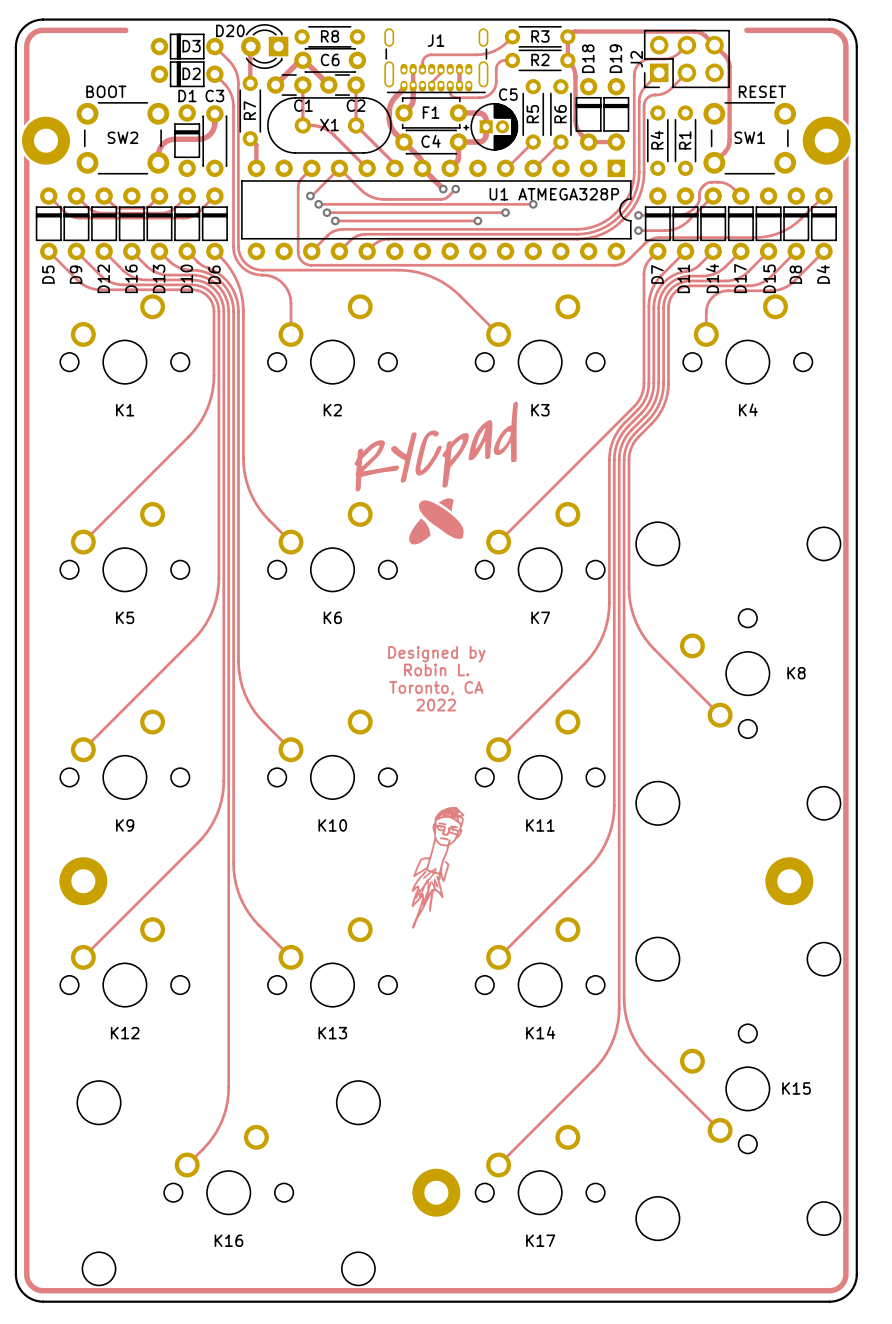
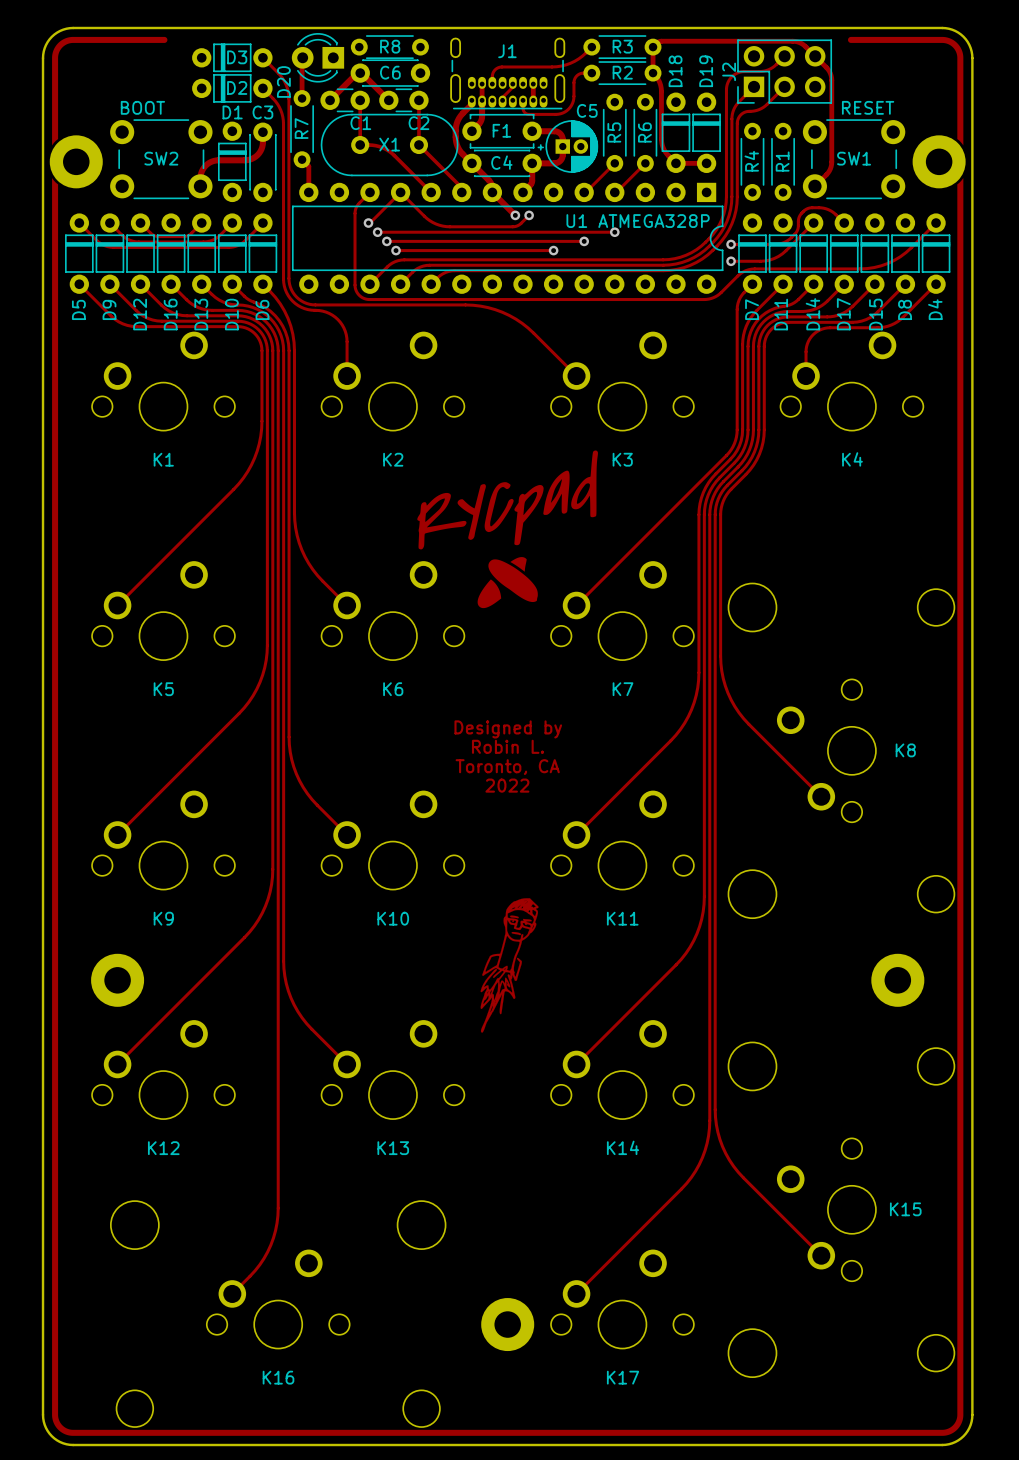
D20 name rotation: 0° (230, 30) -> 90° counterclockwise (283, 82)

